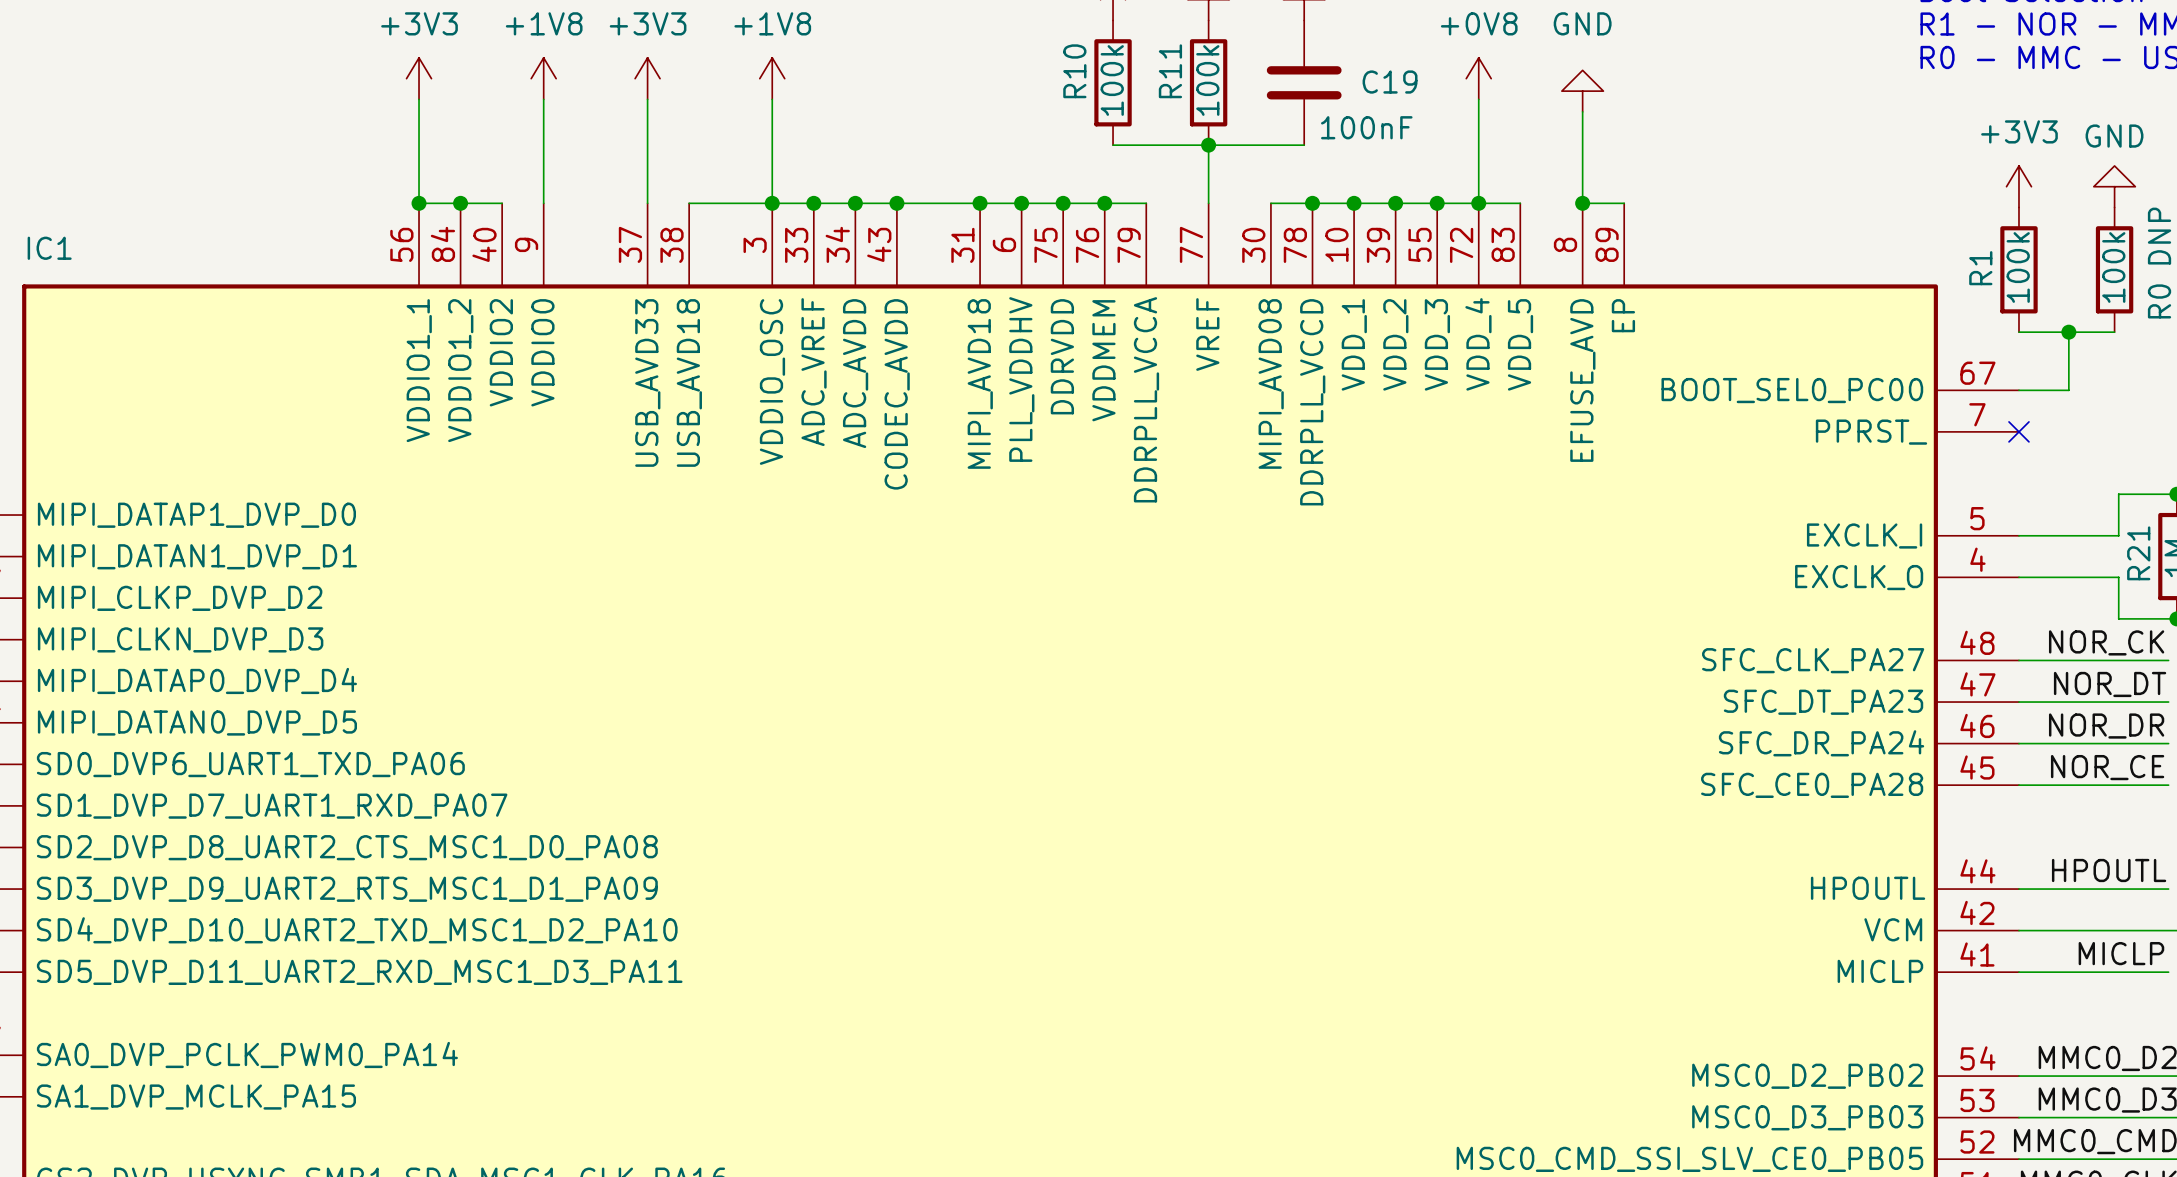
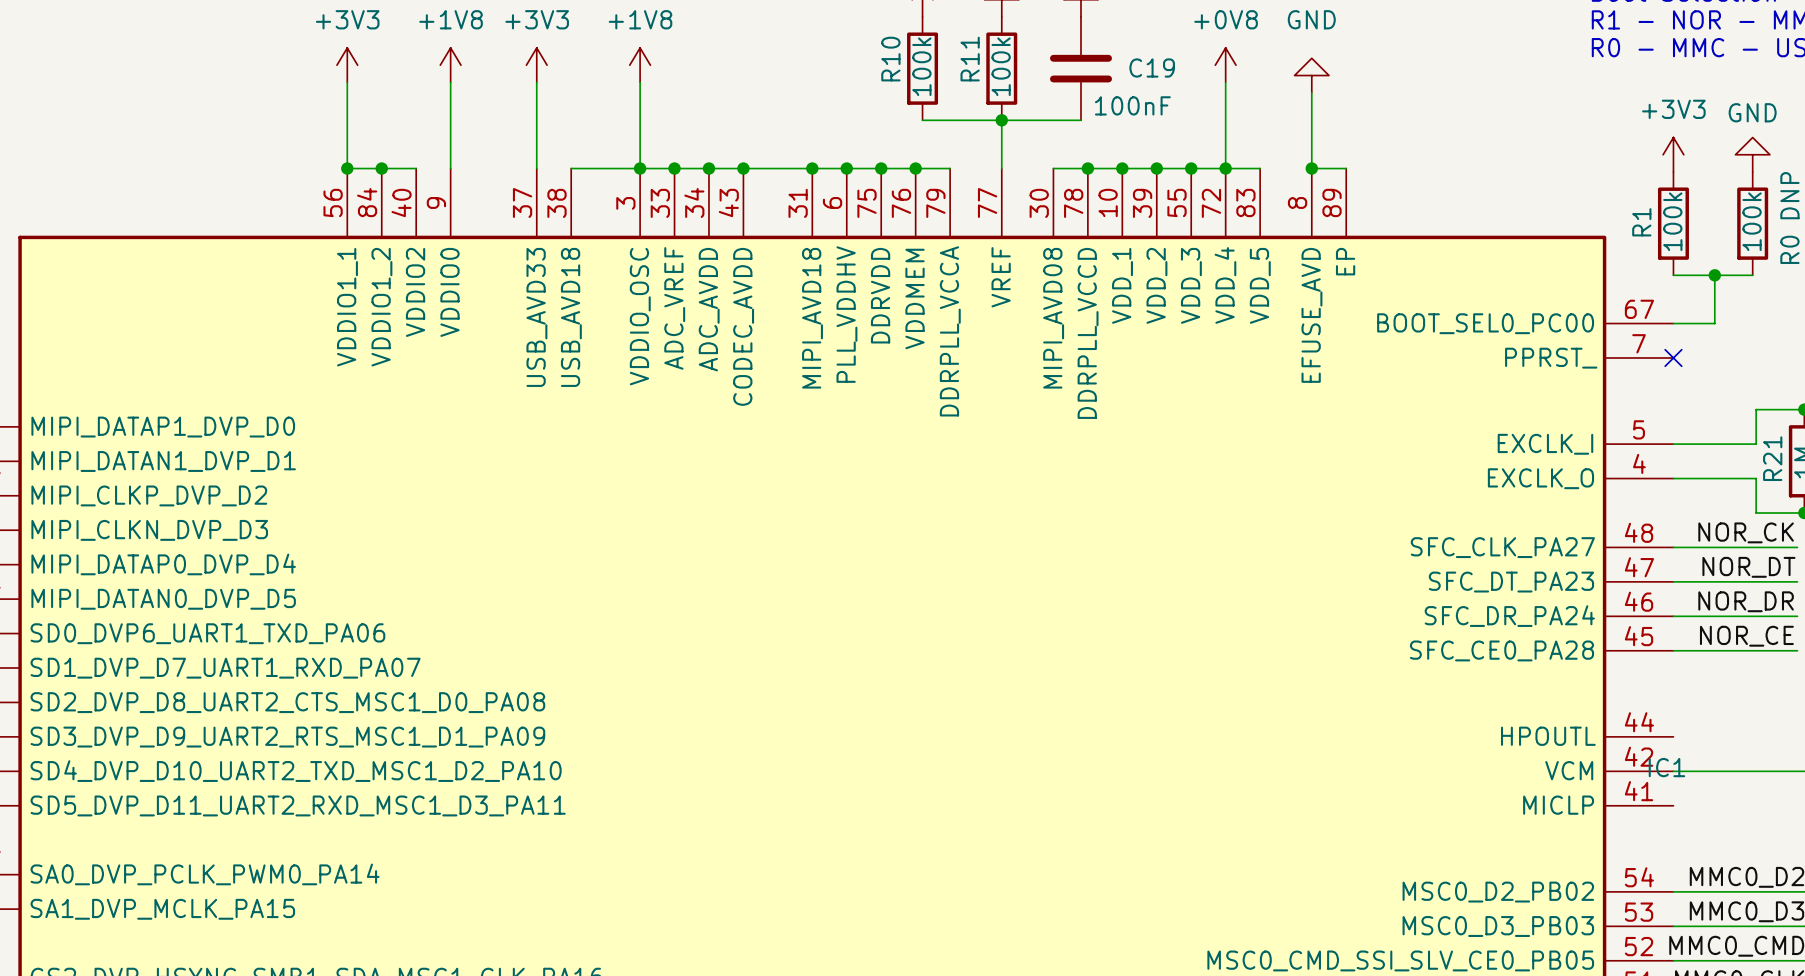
IC1 name position: IC1 (49, 248) -> IC1 (1666, 767)
label: HPOUTL (2109, 870) -> none
wire: (2018, 889) (2168, 889) -> none
label: MICLP (2121, 953) -> none
wire: (2018, 972) (2168, 972) -> none

